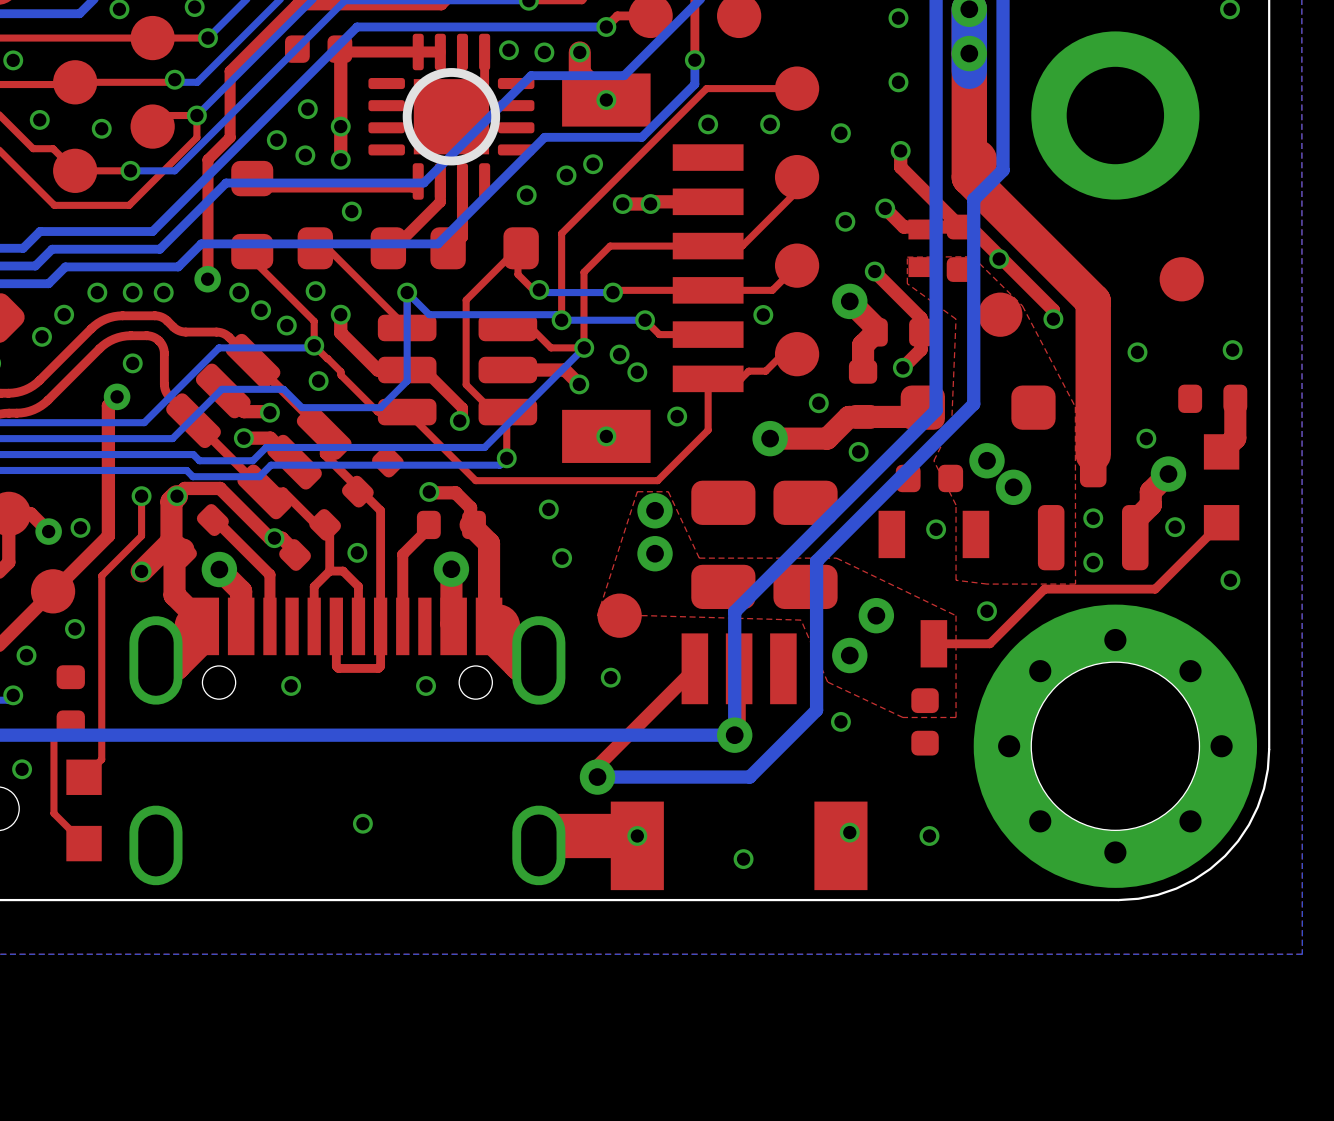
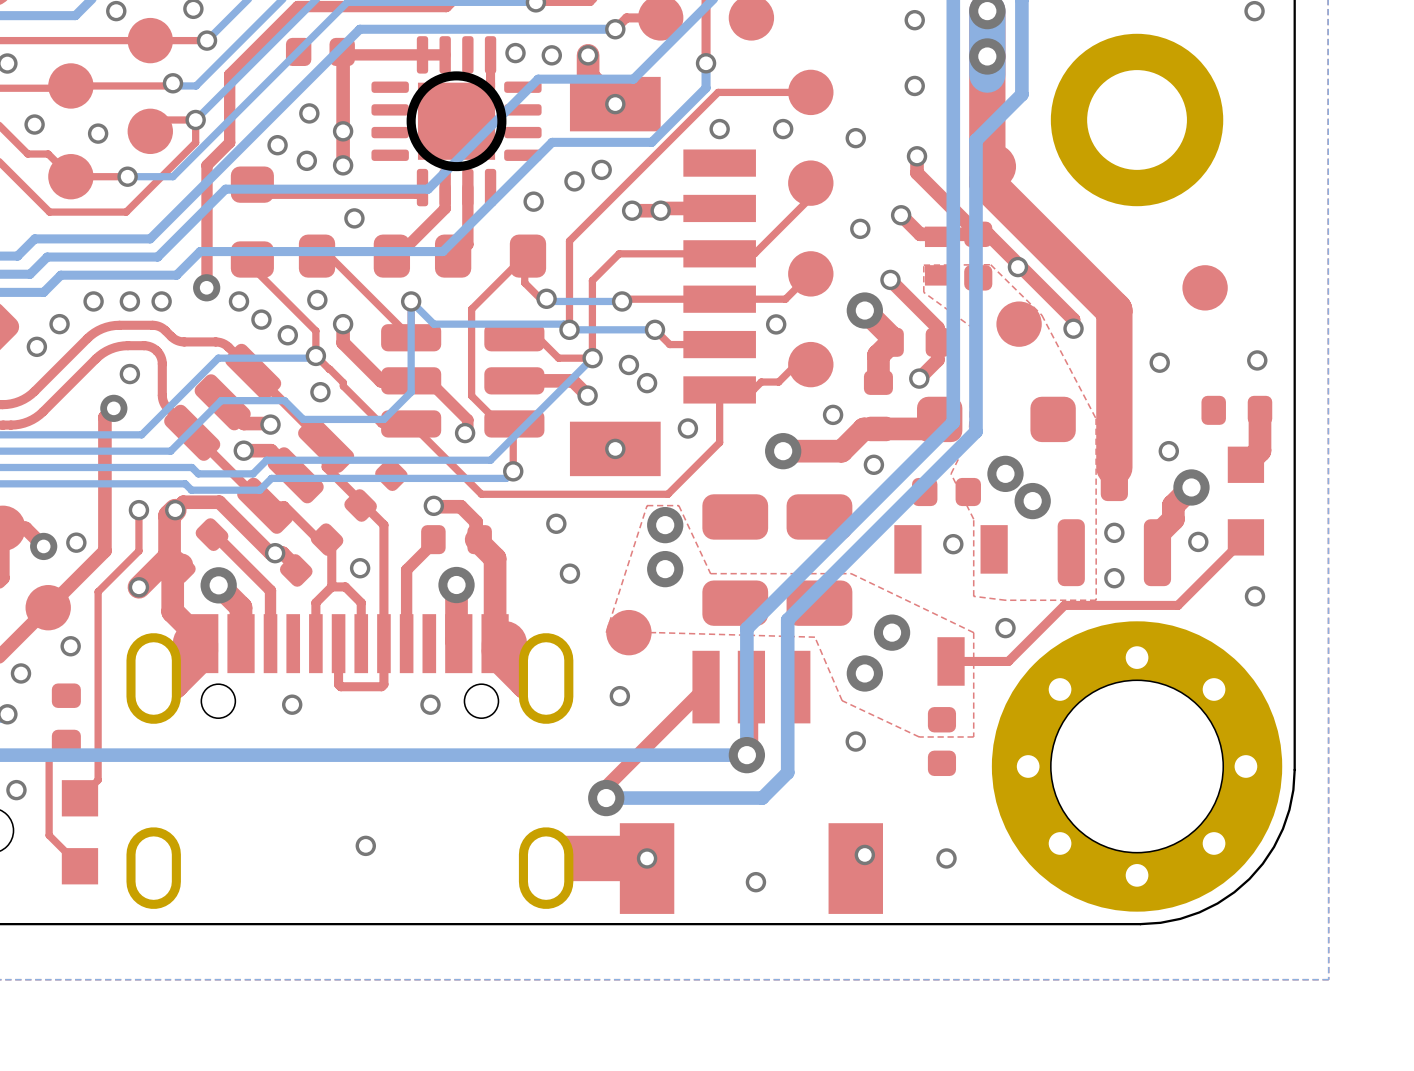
bottom track: (1003, 90) (1003, 170) (973, 199) (973, 404) (958, 419) -> (1021, 94) (975, 140) (975, 431)
bottom track: (816, 561) (816, 710) (774, 752) -> (830, 576) (787, 619) (787, 772)

